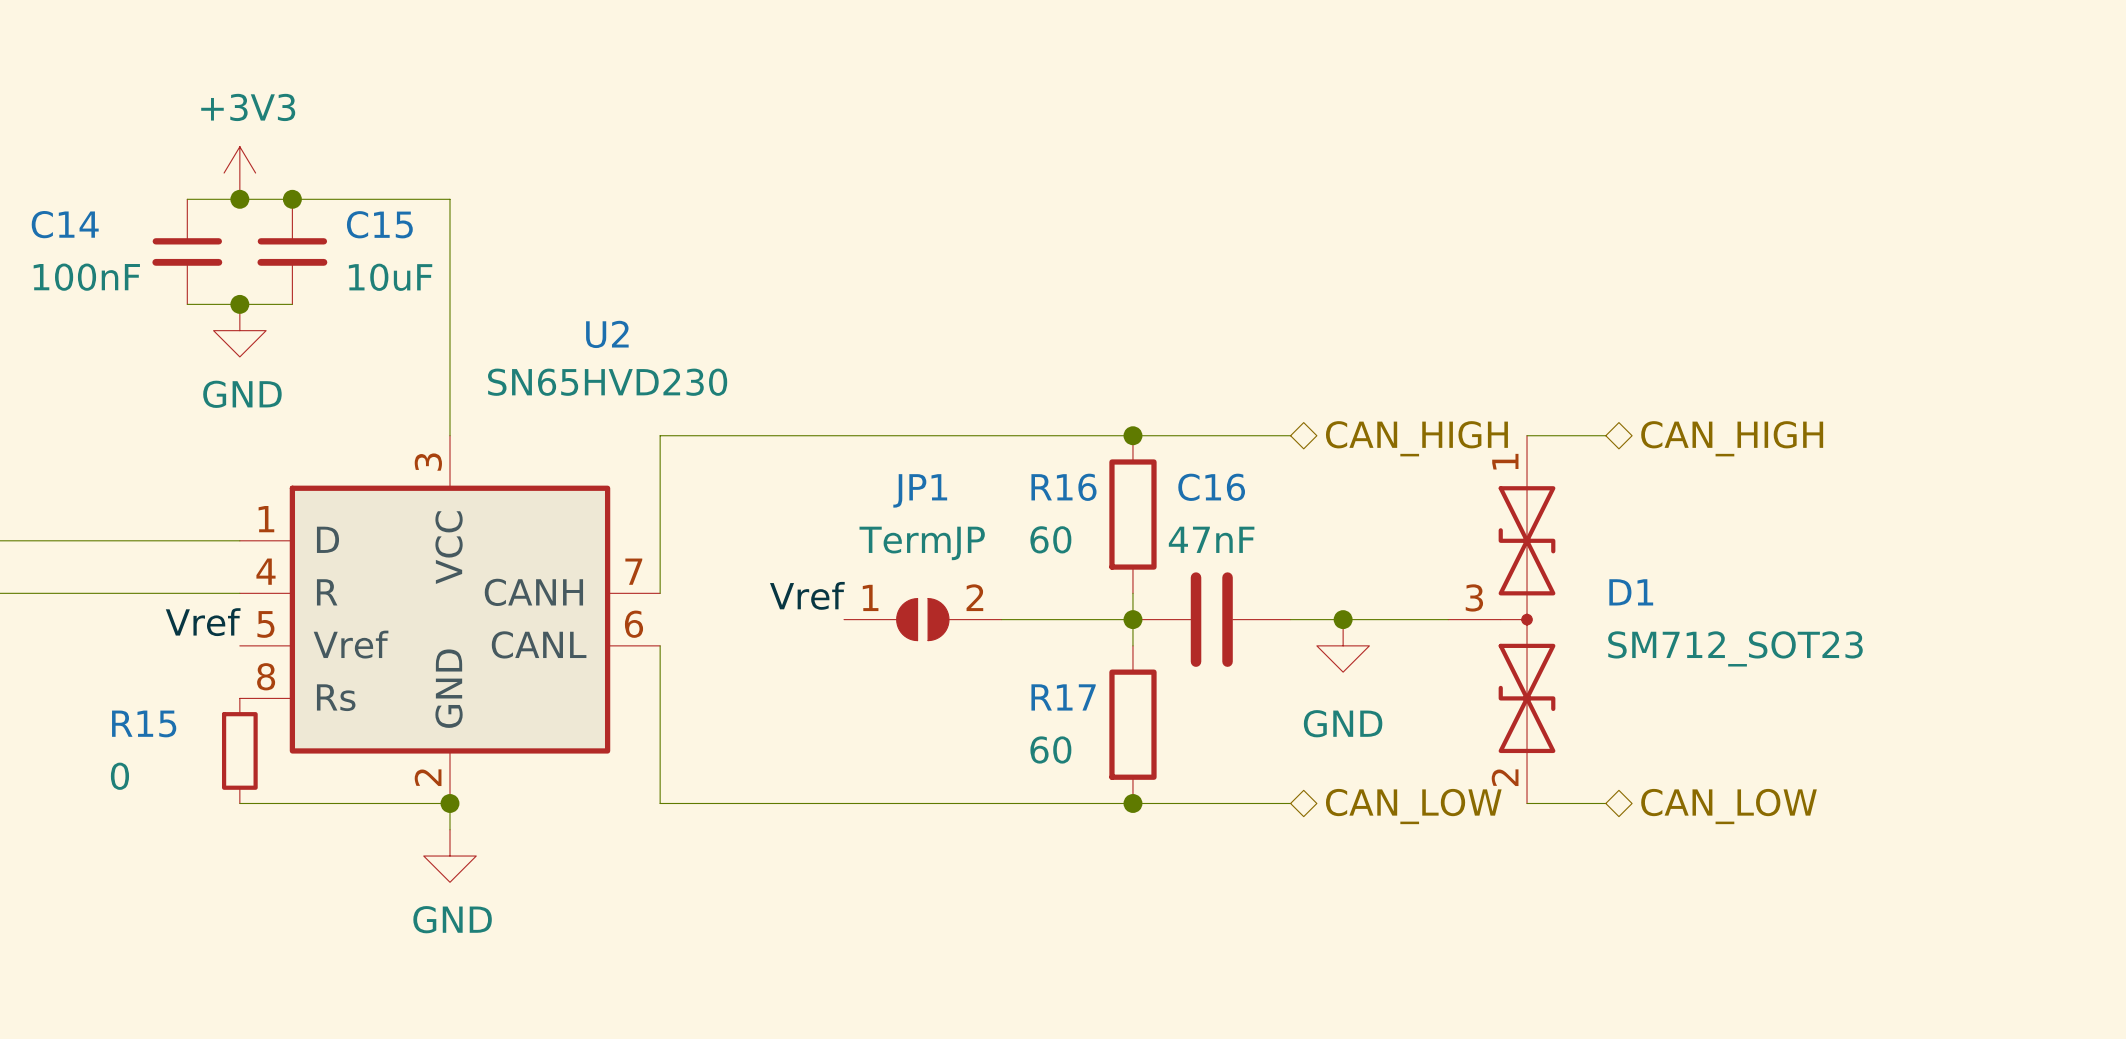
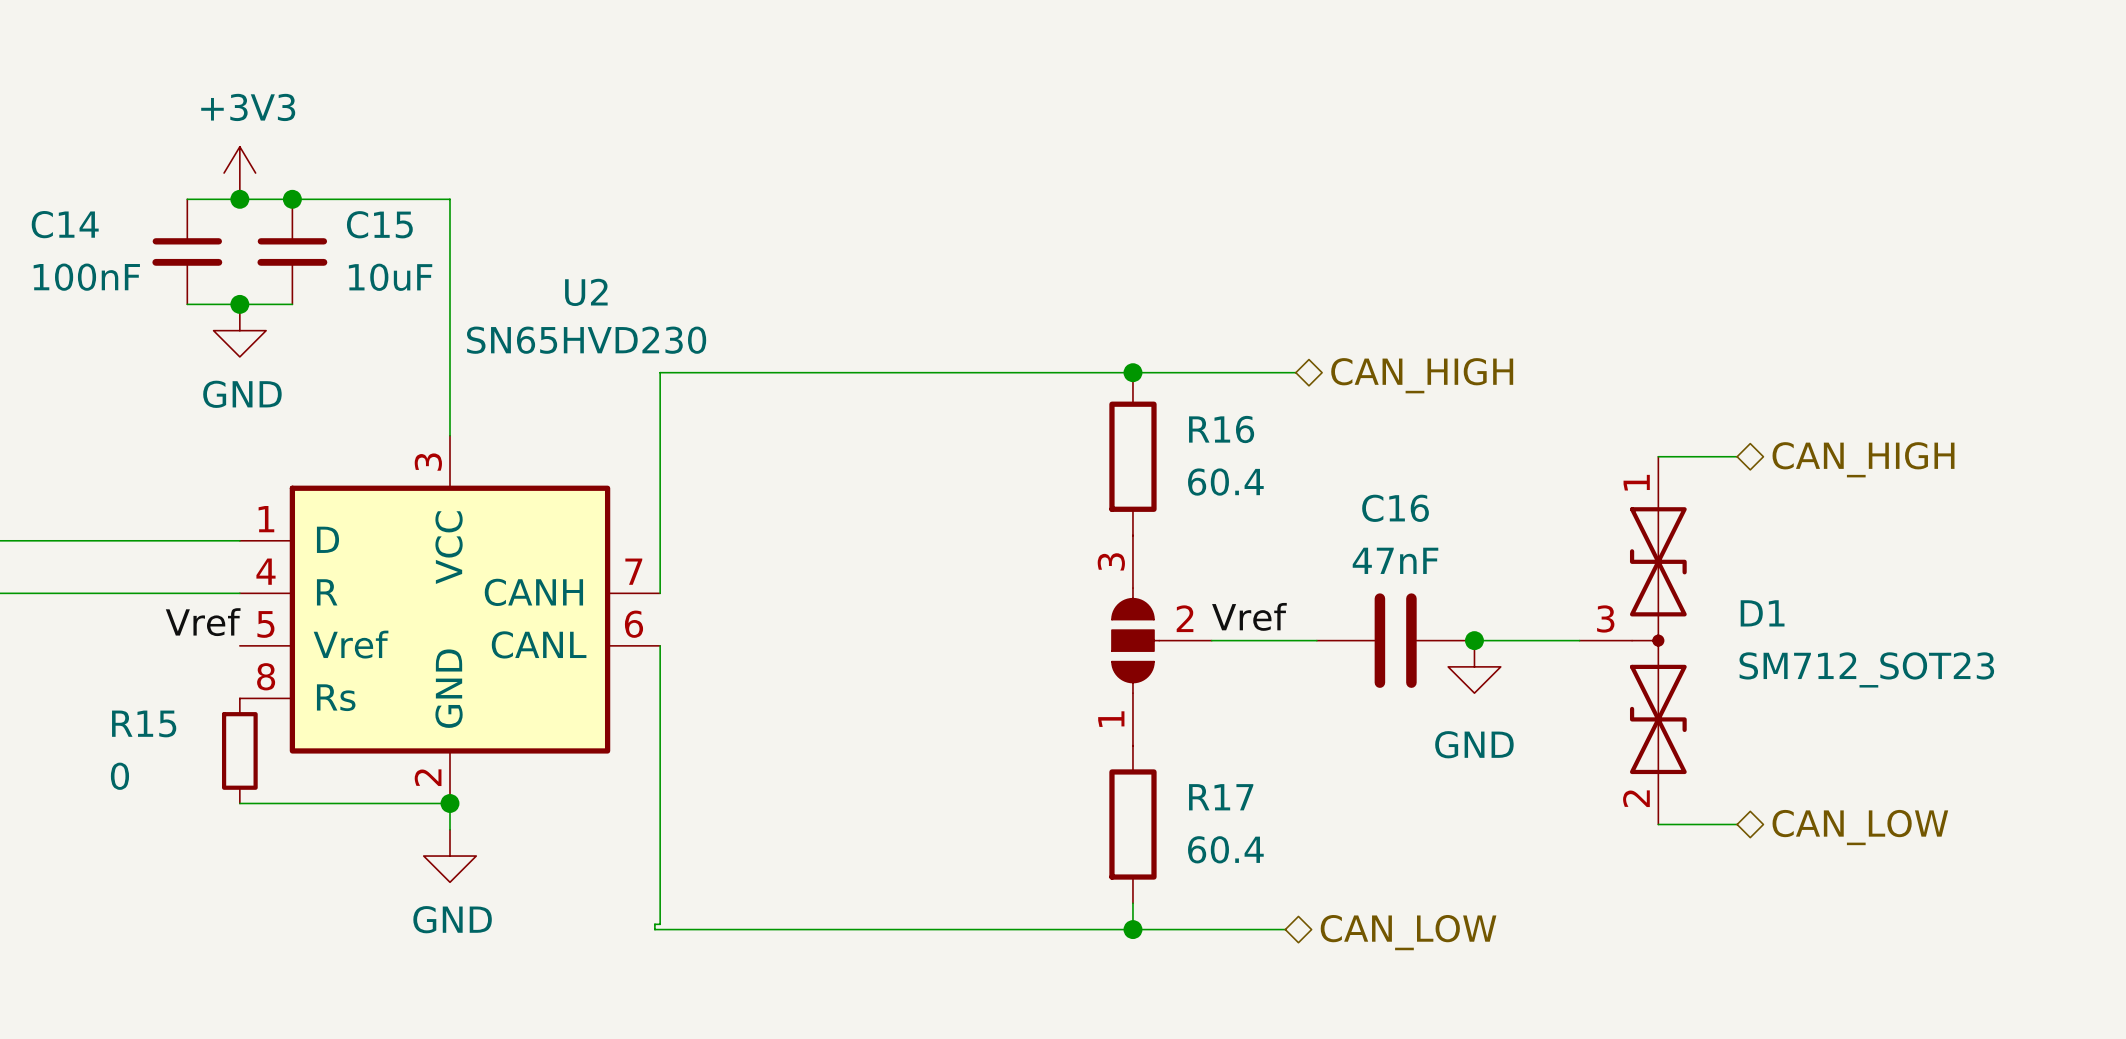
U2 name position: U2 (607, 334) -> U2 (586, 292)
U2 value position: SN65HVD230 (607, 382) -> SN65HVD230 (586, 340)
wire: (660, 435) (1290, 435) -> (660, 435) (660, 372) (1295, 372)
junction position: (1132, 435) -> (1132, 372)
wire: (1527, 435) (1605, 435) -> (1658, 456) (1737, 456)
hierarchical label position: CAN_HIGH (1416, 438) -> CAN_HIGH (1422, 375)
hierarchical label position: CAN_HIGH (1732, 438) -> CAN_HIGH (1863, 459)
R16 name position: R16 (1063, 487) -> R16 (1221, 429)
R16 position: (1132, 514) -> (1132, 456)
R16 value: 60 (1050, 539) -> 60.4 (1225, 482)
label position: Vref (807, 595) -> Vref (1249, 616)
JP1: TermJP (922, 619) -> none
wire: (1001, 619) (1132, 619) -> none
junction: (1132, 619) -> none
C16 position: (1211, 619) -> (1395, 640)
wire: (1290, 619) (1448, 619) -> none
junction: (1343, 619) -> none
D1 position: (1501, 619) -> (1633, 640)
part: none -> (1161, 640)
wire: none -> (1211, 640) (1316, 640)
wire: none -> (1474, 640) (1579, 640)
junction: none -> (1474, 640)
power symbol position: GND (1343, 645) -> GND (1474, 666)
R17 name position: R17 (1063, 697) -> R17 (1221, 797)
R17 position: (1132, 724) -> (1132, 824)
R17 value: 60 (1050, 749) -> 60.4 (1225, 849)
wire: (660, 803) (1290, 803) -> (660, 803) (660, 924) (654, 924) (654, 929) (1285, 929)
junction: (1132, 803) -> none
wire: (1527, 803) (1605, 803) -> (1658, 824) (1737, 824)
hierarchical label position: CAN_LOW (1413, 806) -> CAN_LOW (1408, 932)
hierarchical label position: CAN_LOW (1729, 806) -> CAN_LOW (1860, 827)
wire: none -> (1132, 903) (1132, 929)
junction: none -> (1132, 929)

